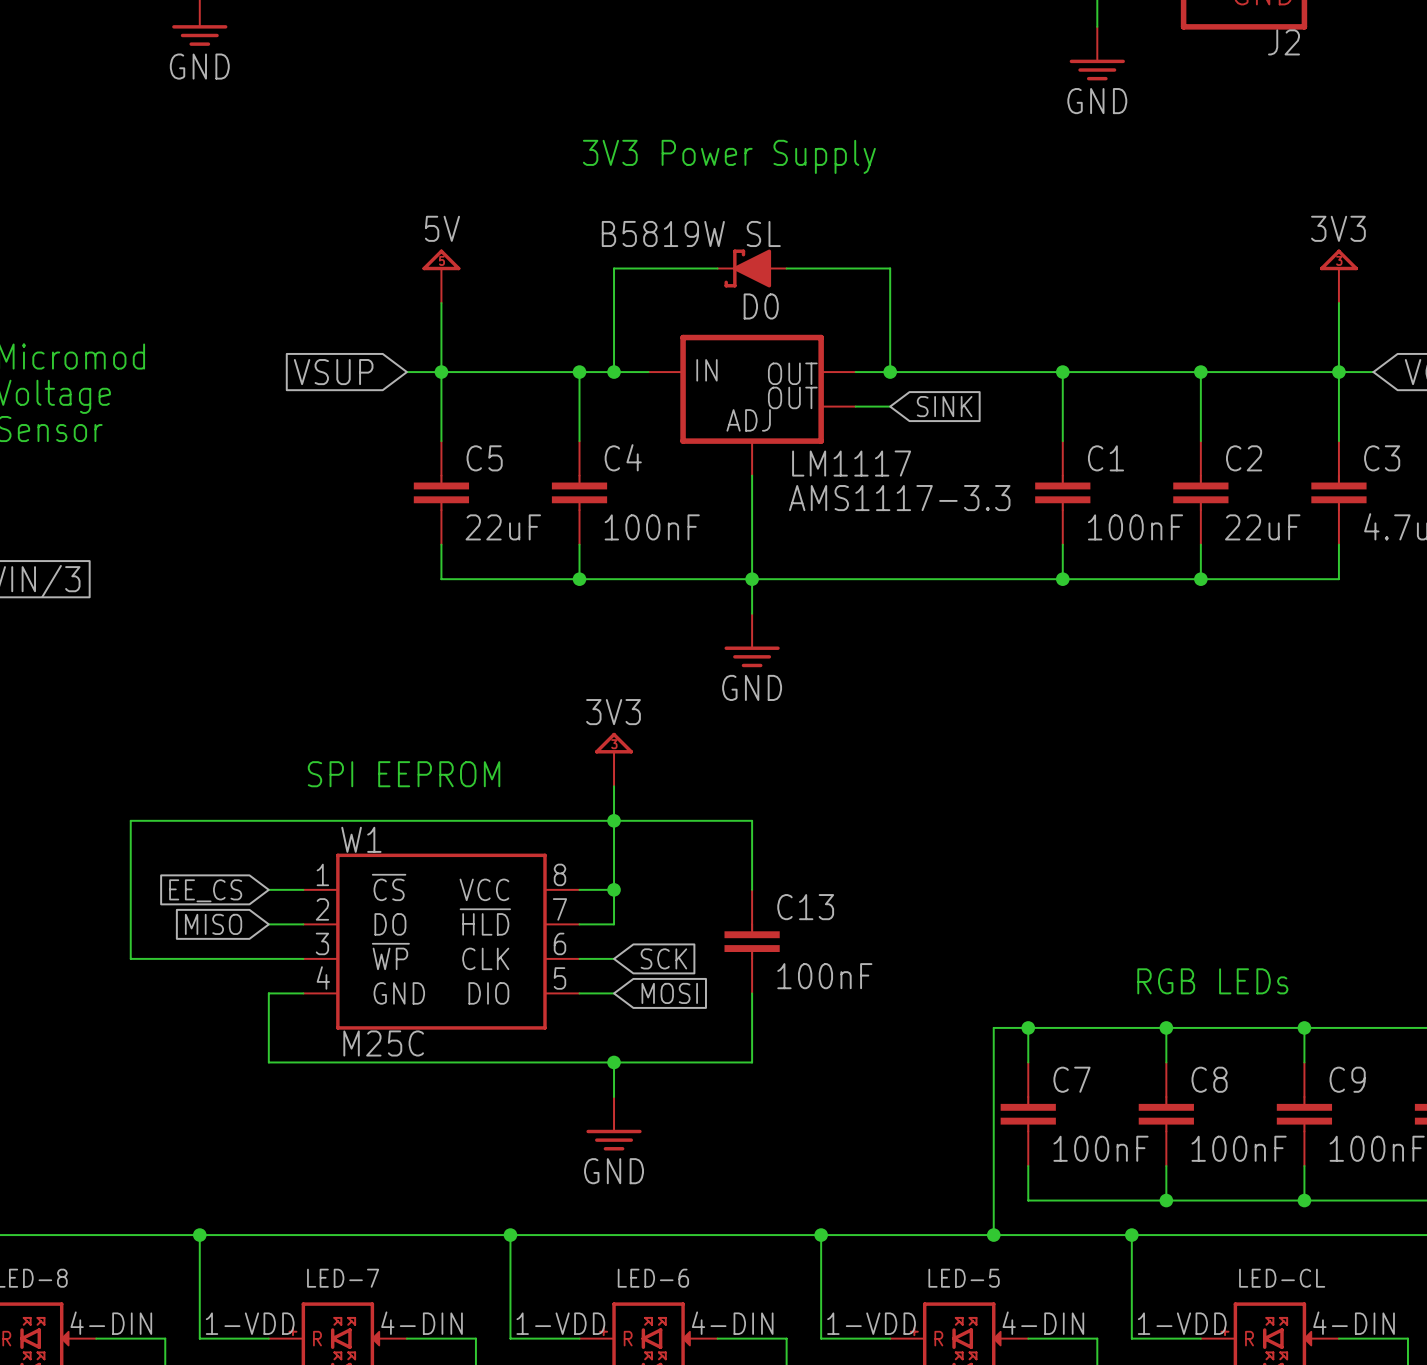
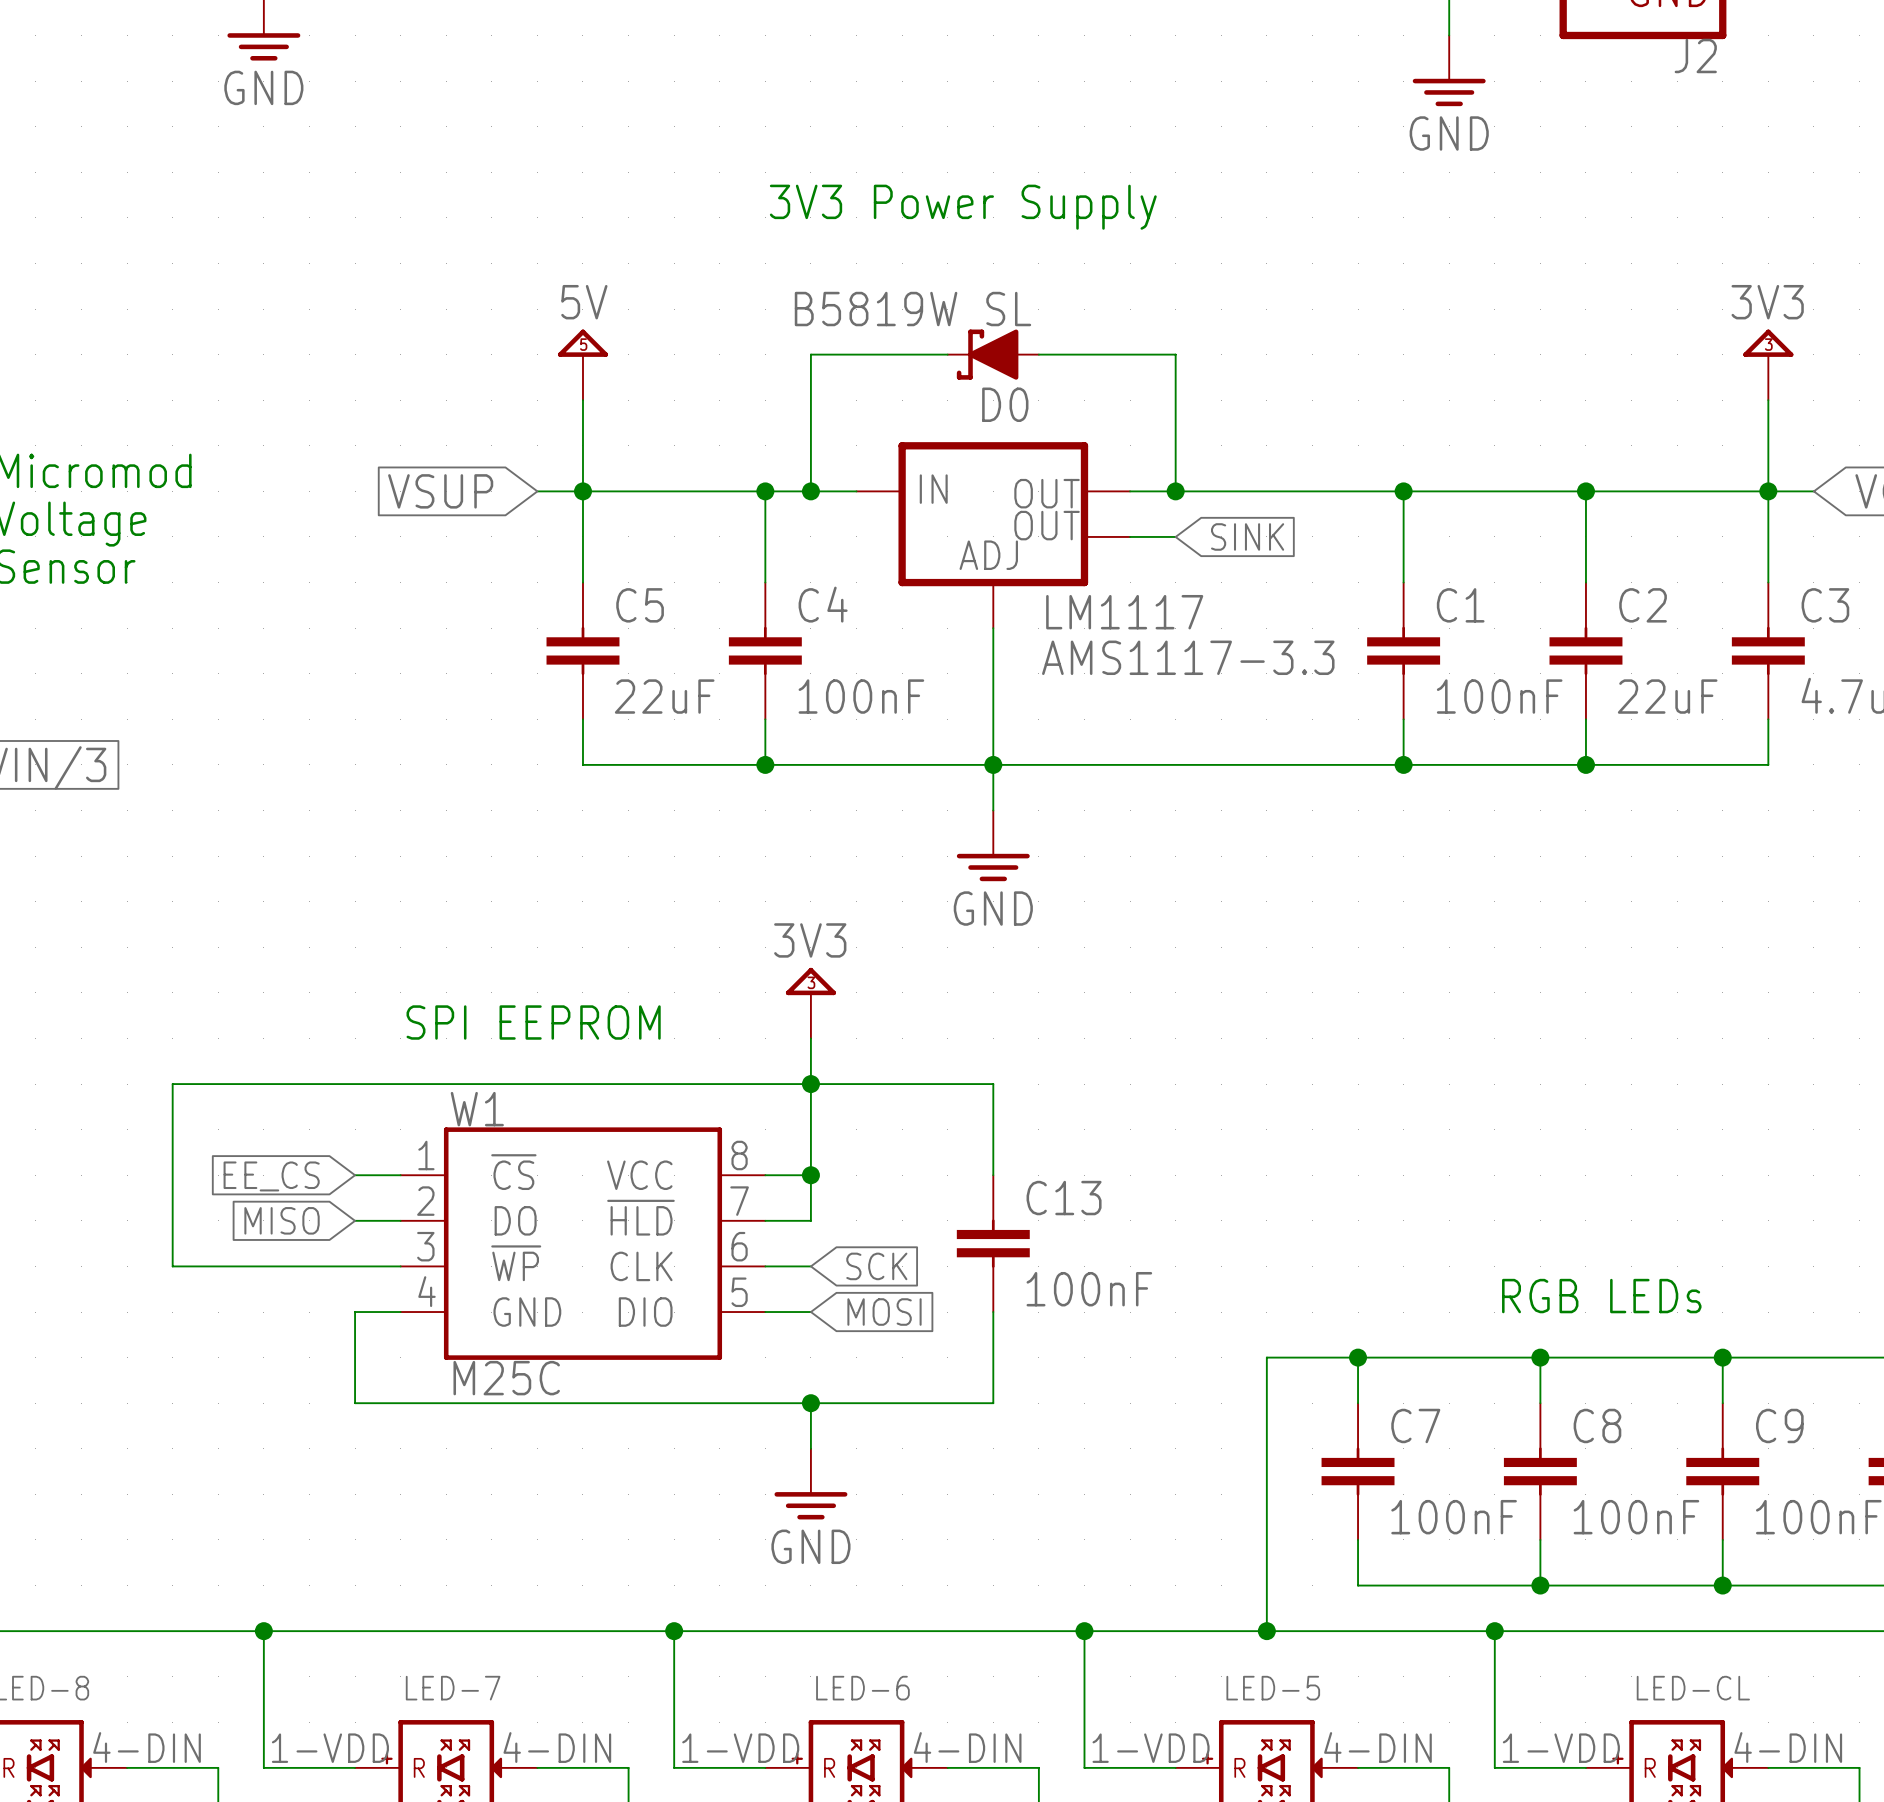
wire: (993, 1027) (993, 1235) -> (1312, 1357) (1266, 1357) (1266, 1631)
junction position: (993, 1235) -> (1266, 1631)

